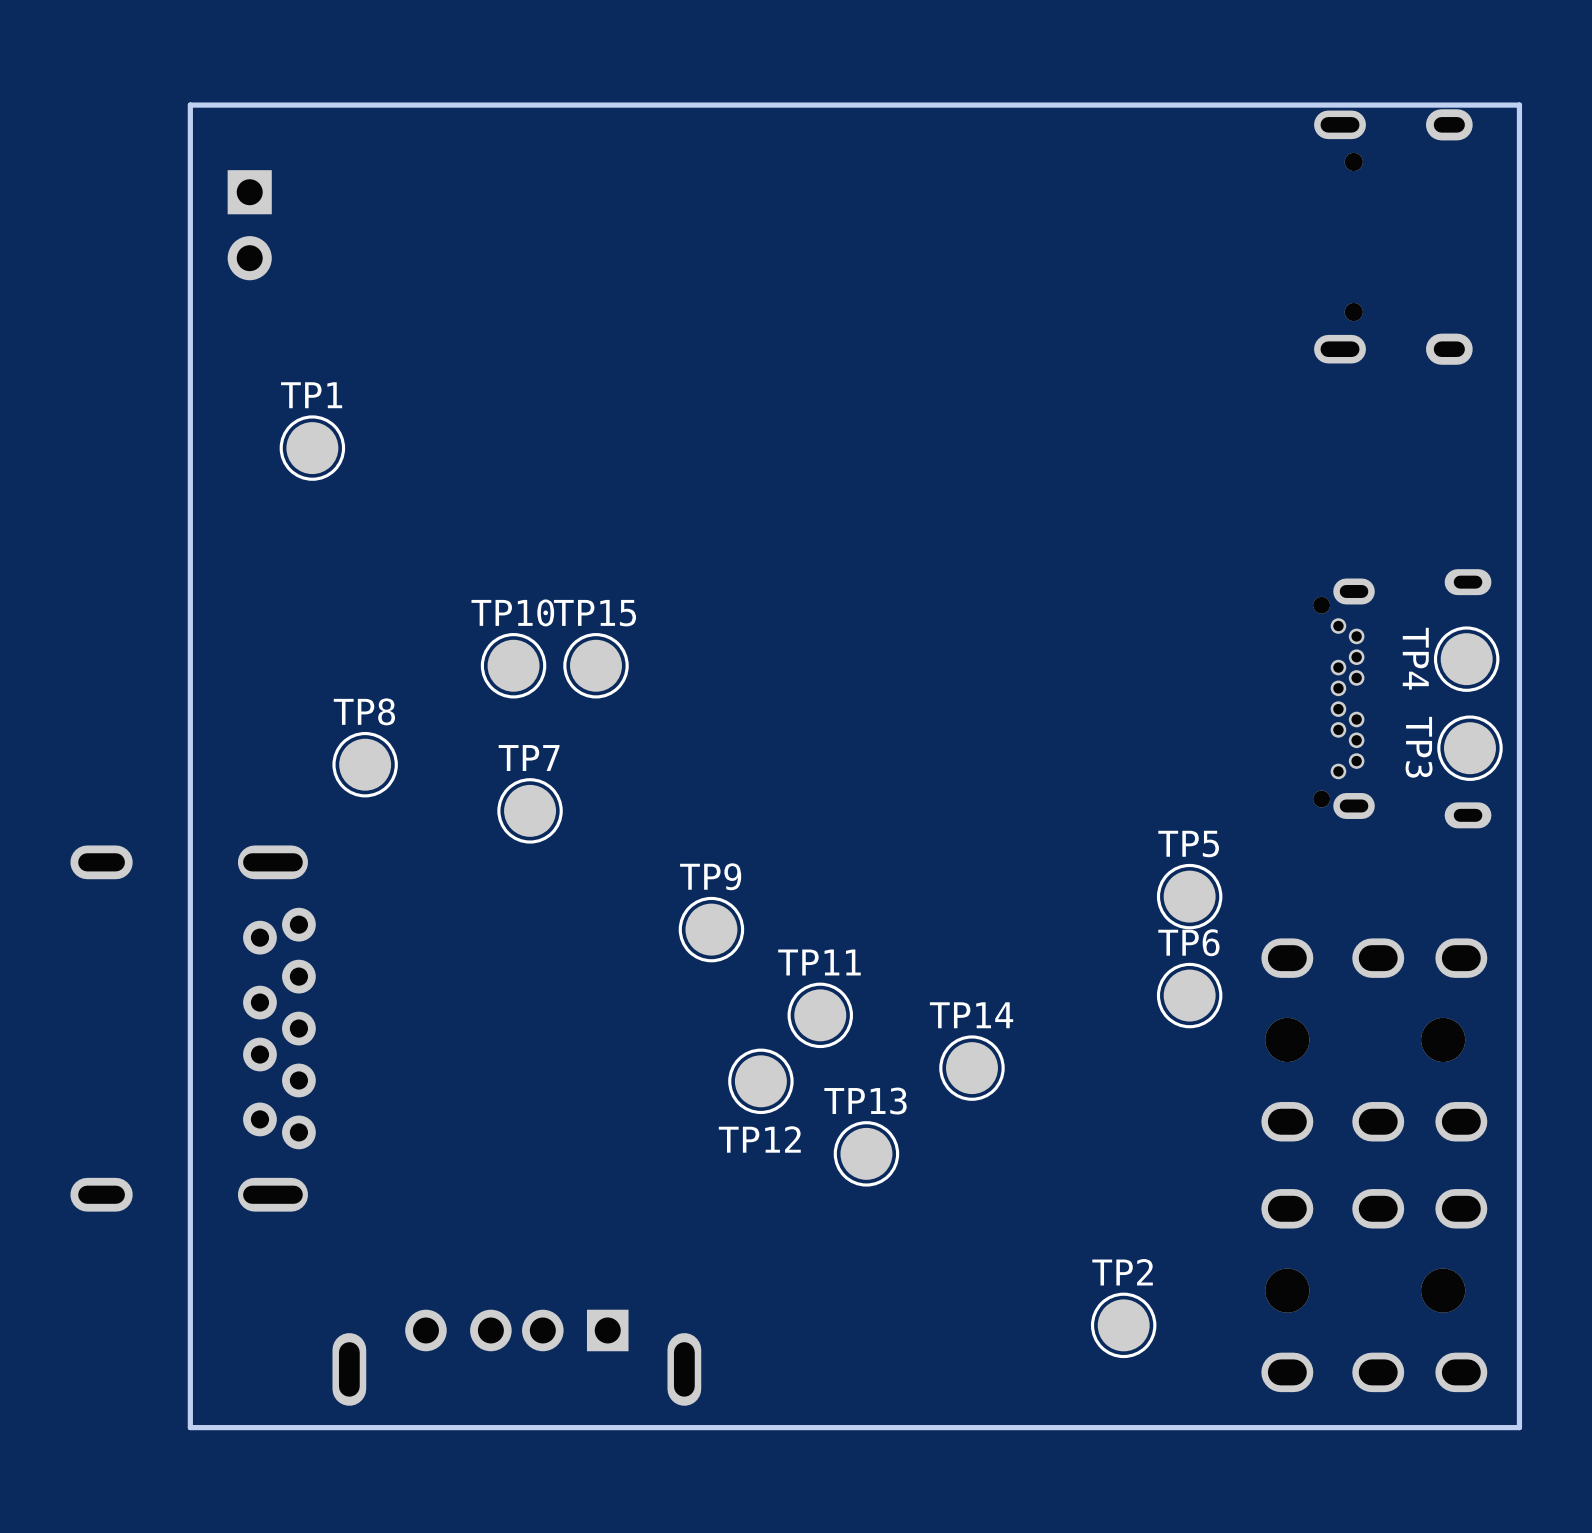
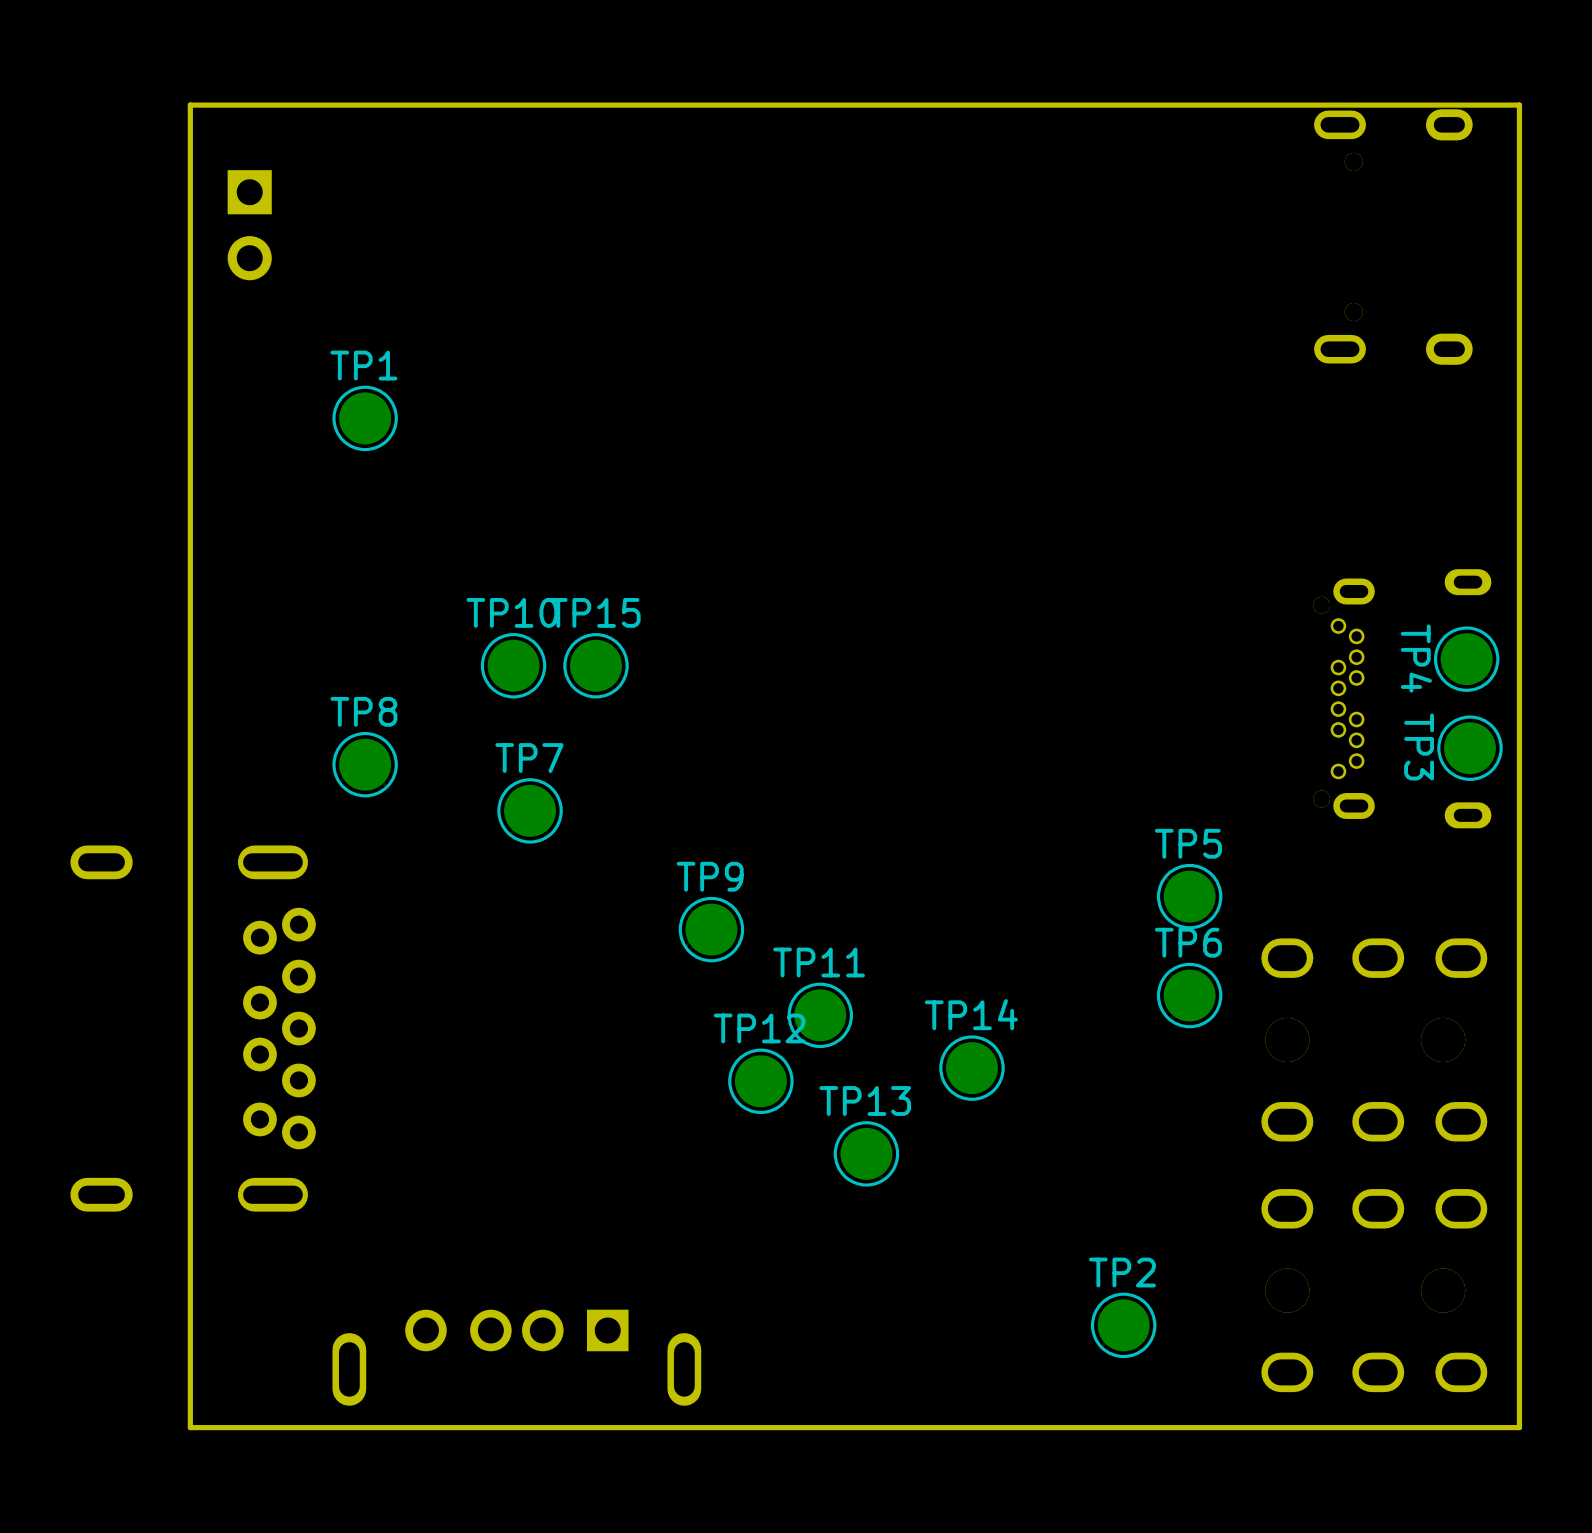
TP1 position: (312, 448) -> (365, 418)
TP12 name position: TP12 (759, 1139) -> TP12 (759, 1028)

